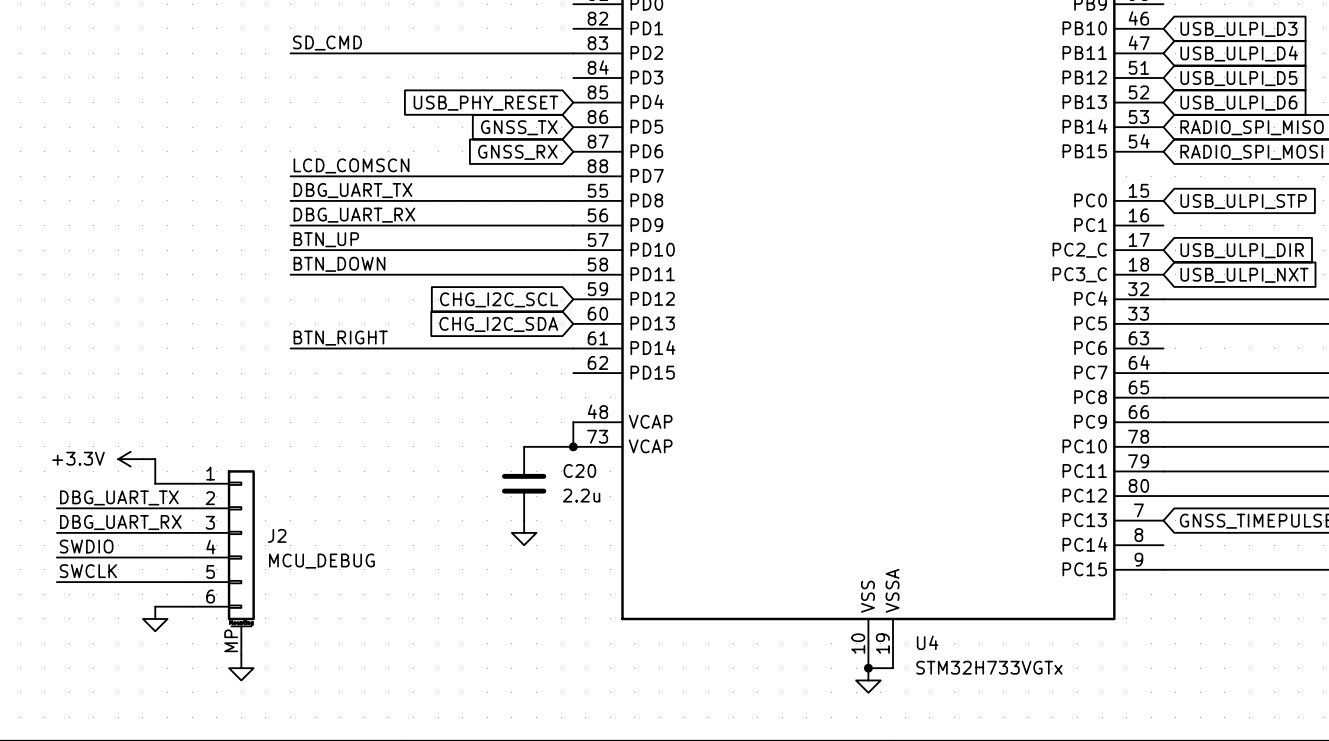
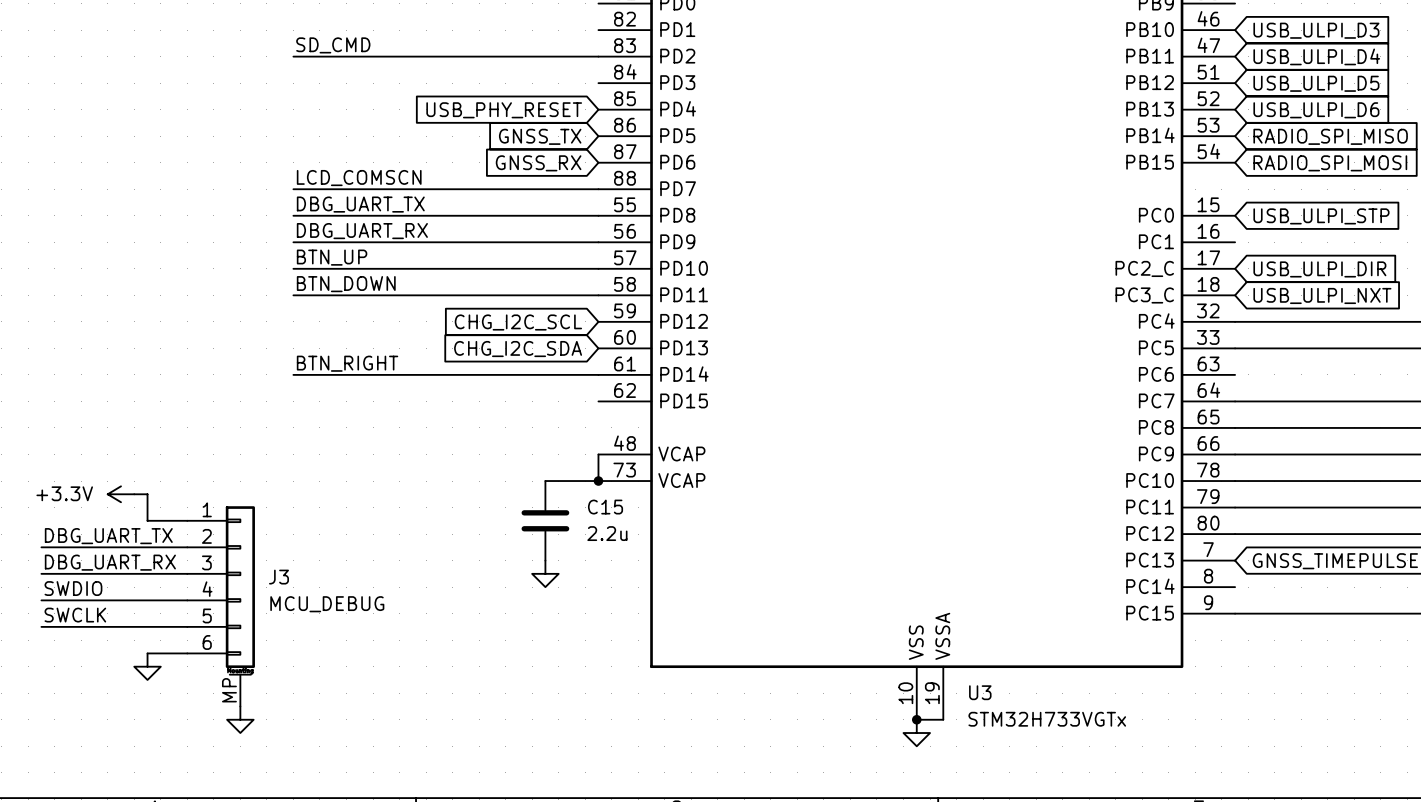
C20 name: C20 (579, 470) -> C15 (605, 507)
J2 name: J2 (277, 535) -> J3 (279, 577)
U4 name: U4 (927, 642) -> U3 (980, 692)

